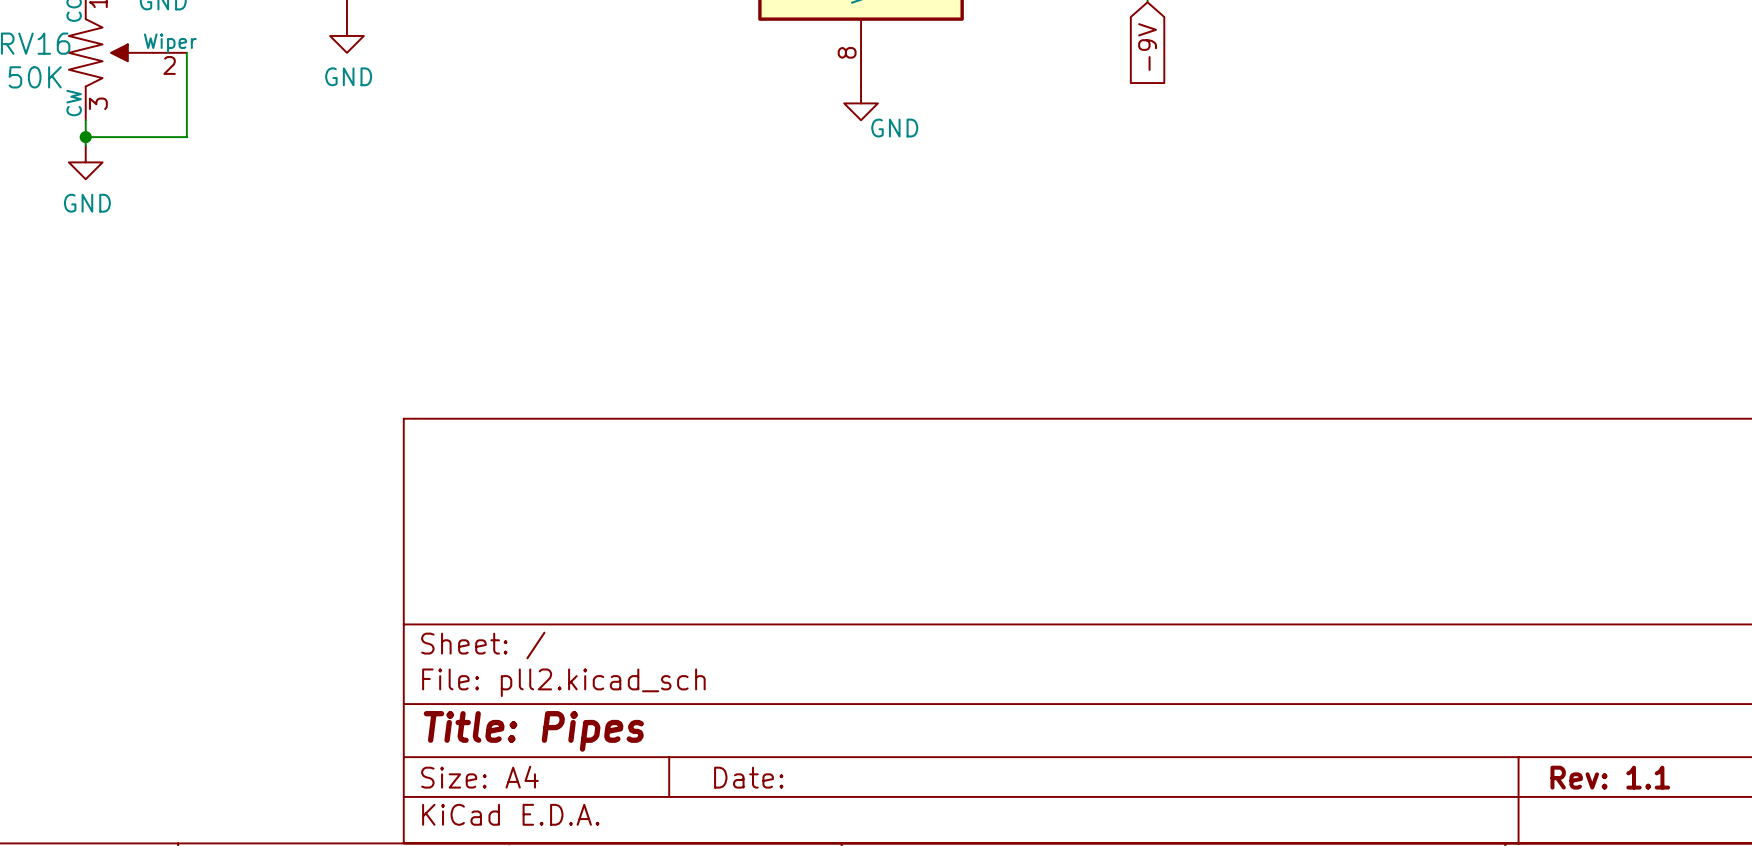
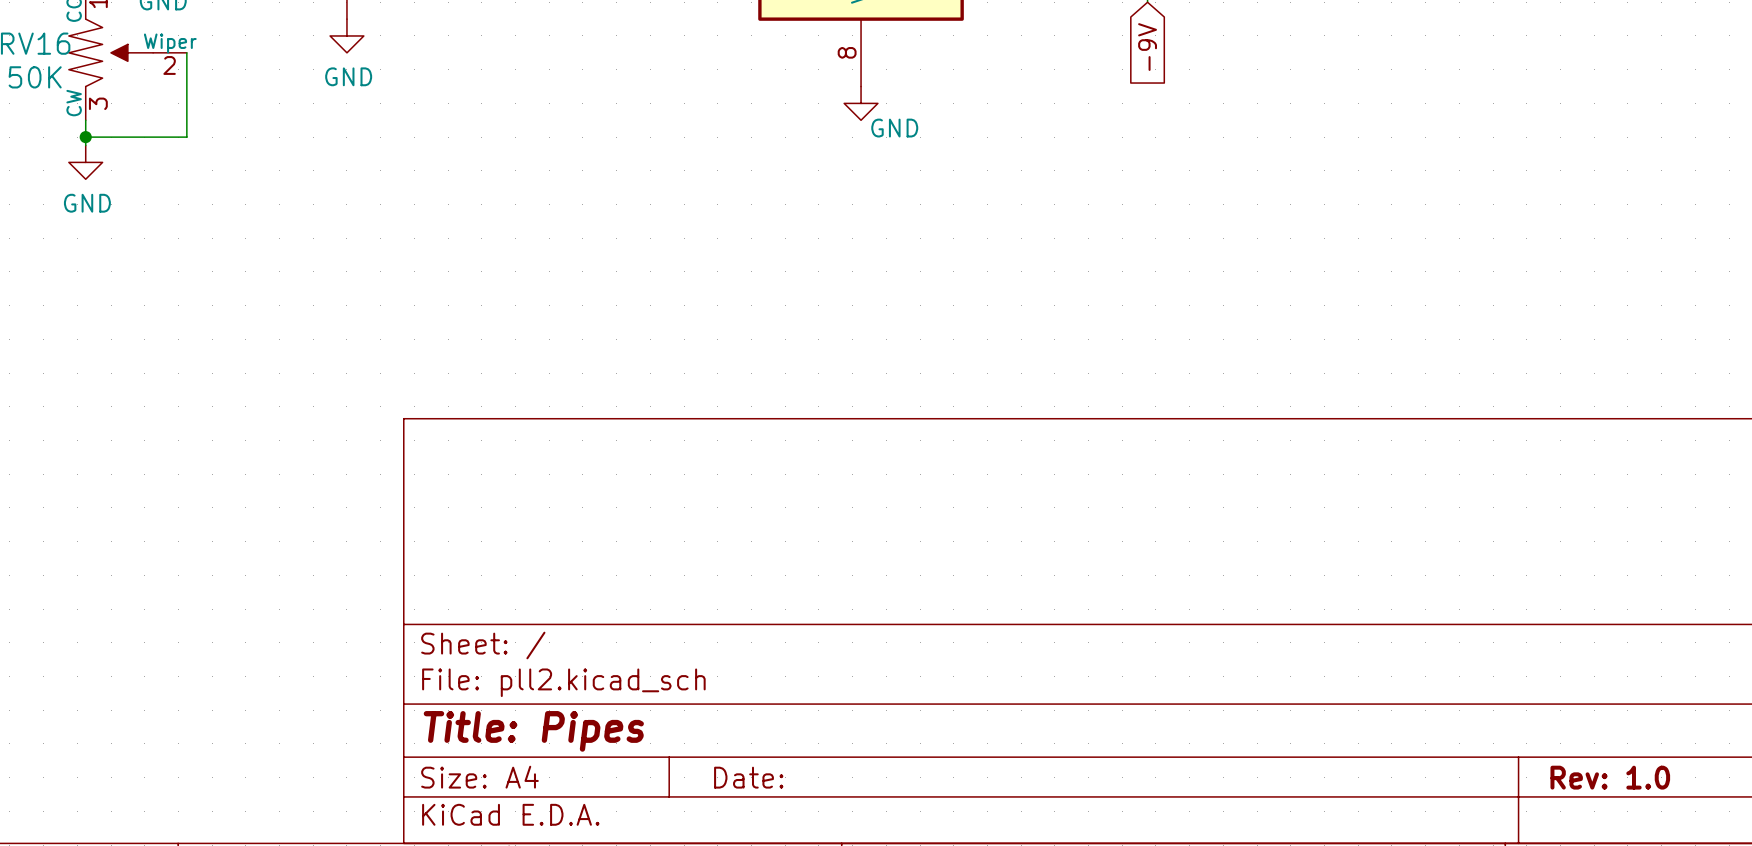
title block: Rev: 1.1 (1610, 777) -> Rev: 1.0 (1610, 777)

